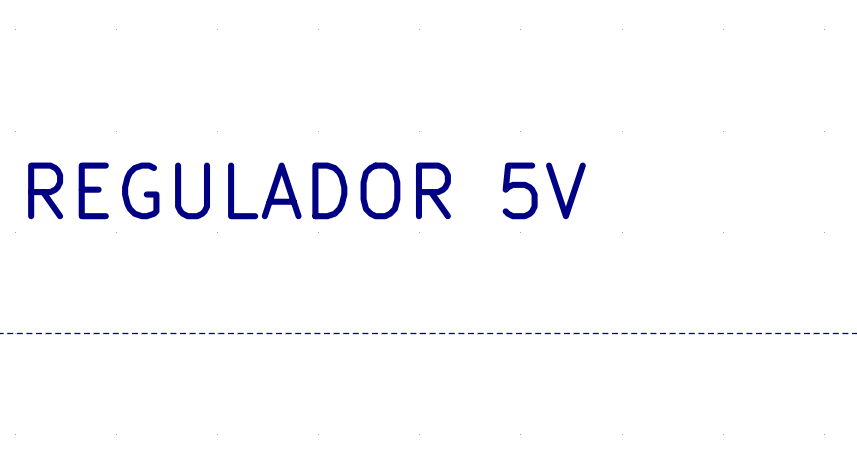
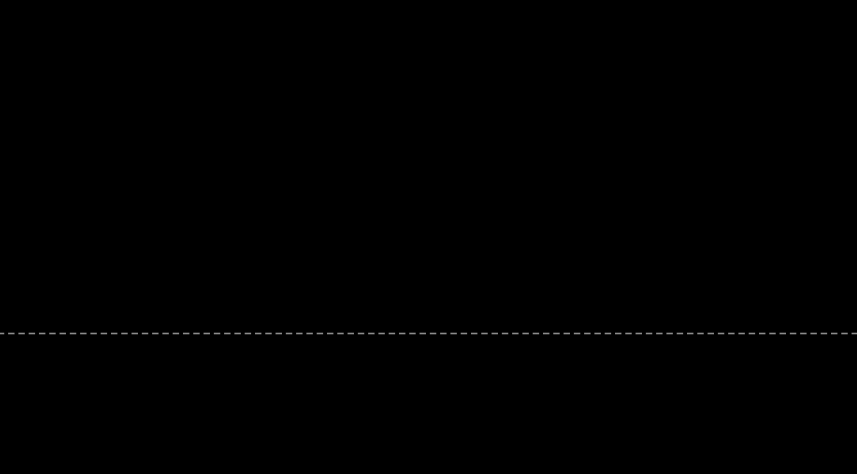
text: REGULADOR 5V (306, 190) -> none

